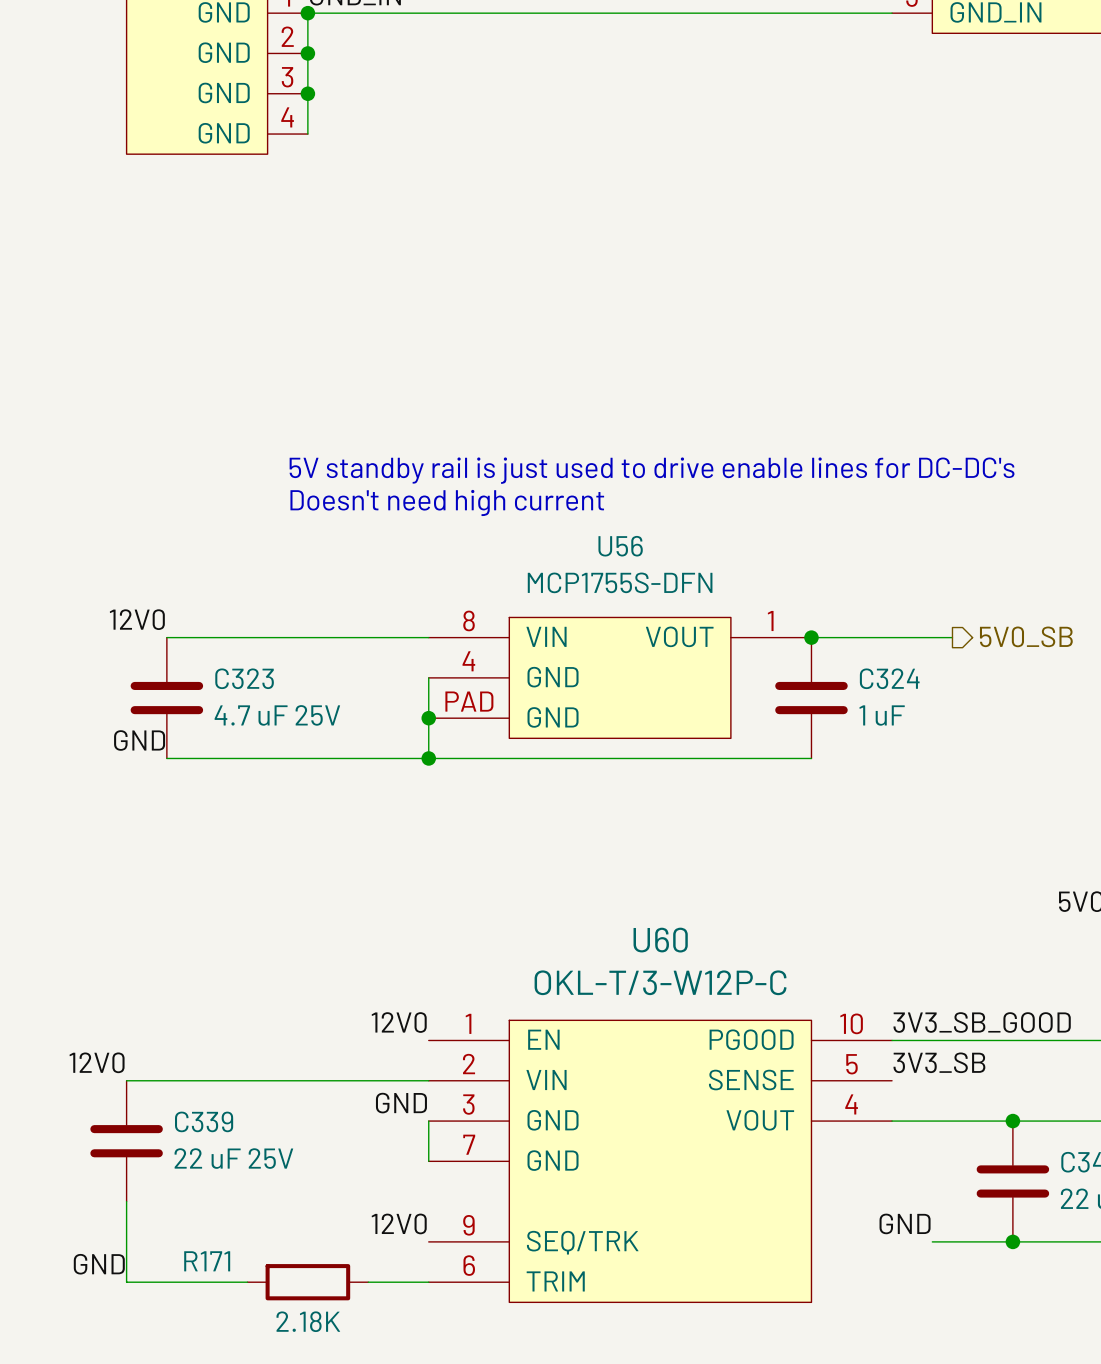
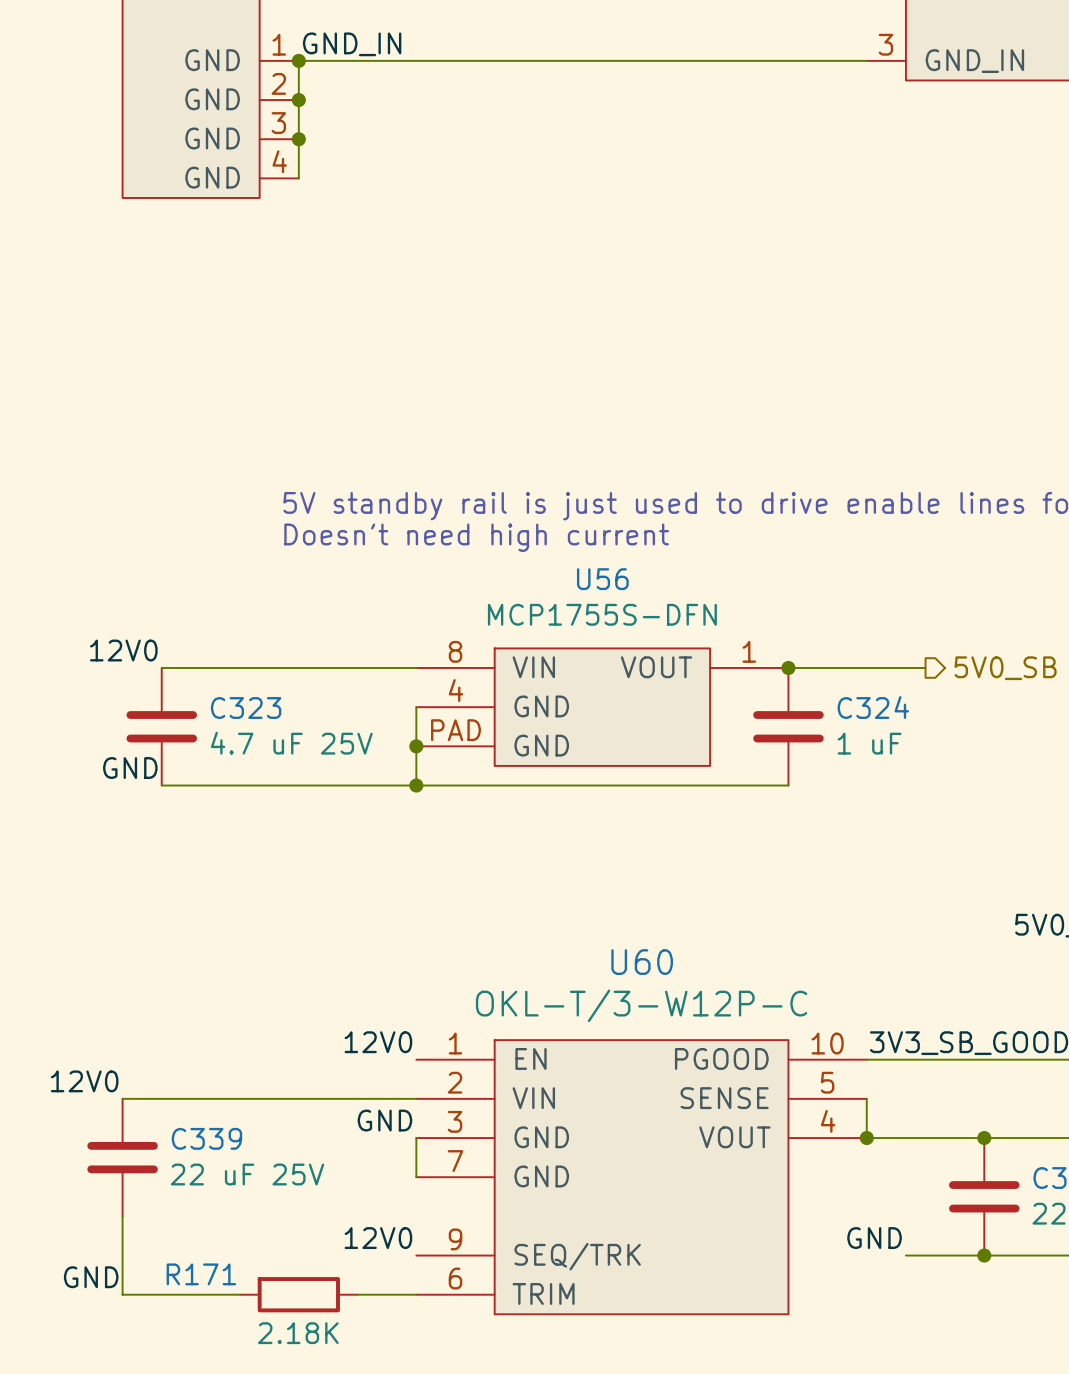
label: 3V3_SB (939, 1062) -> none
wire: none -> (866, 1098) (866, 1138)
junction: none -> (866, 1138)

